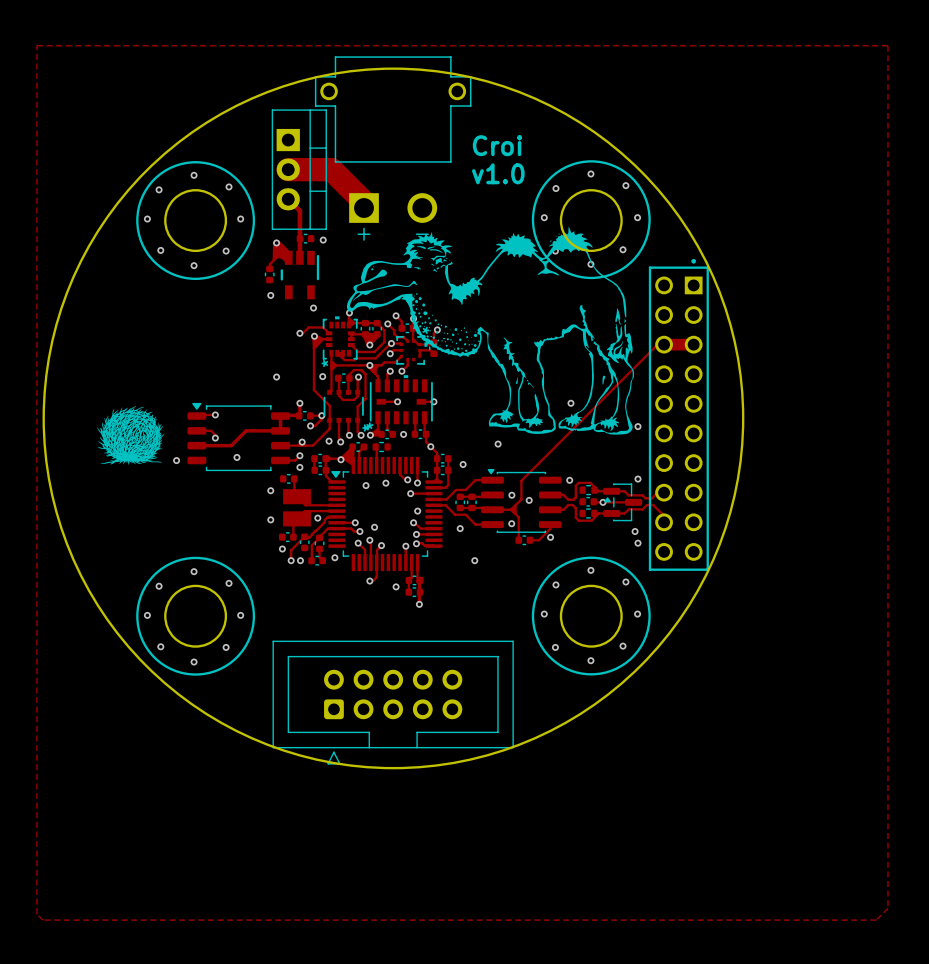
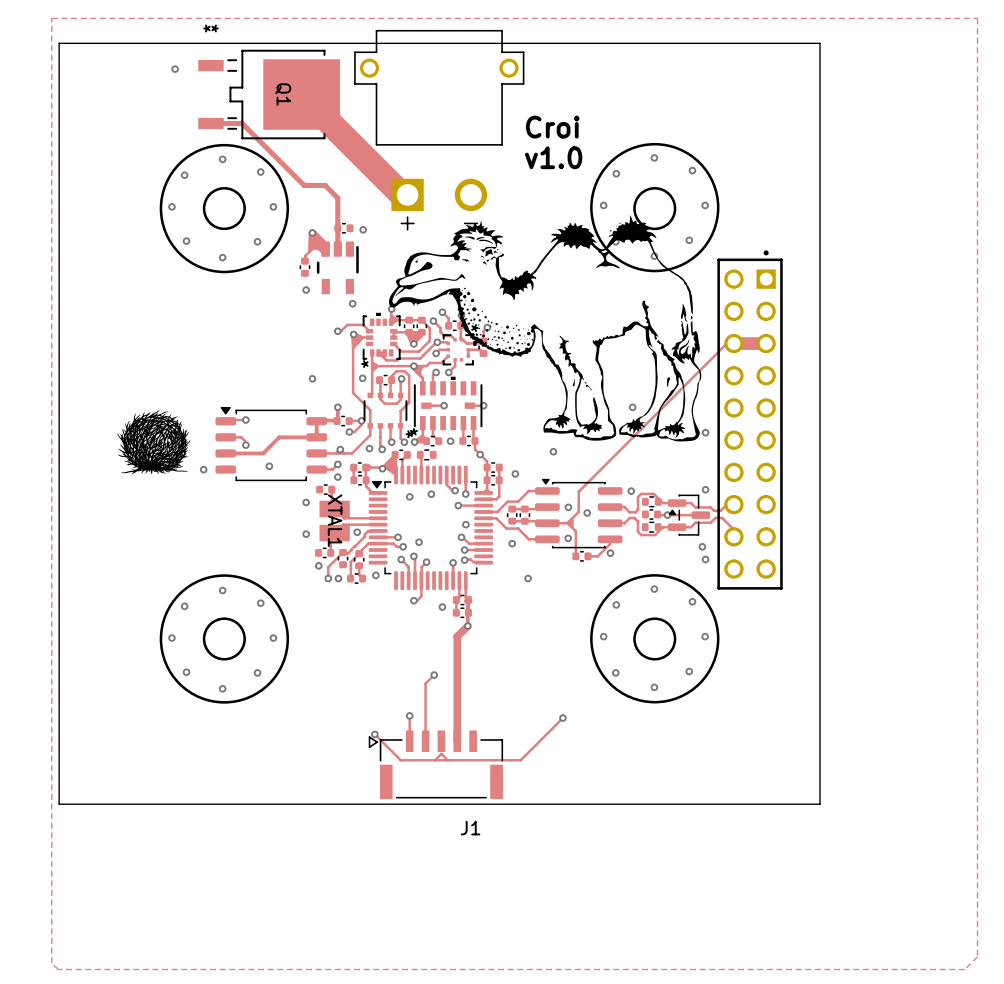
round board edge: [42, 67, 745, 770] -> none
board edge: none -> (59, 43) (820, 43) (820, 804) (59, 804) (59, 43)
via: none -> (175, 69)
Q1: none -> (269, 94)
track: none -> (301, 94) (402, 194) (407, 194)
track: none -> (210, 123) (242, 123) (304, 185) (325, 185)
track: (288, 169) (331, 169) (364, 202) -> none
part: (299, 169) -> none
round board edge size: [164, 189, 228, 253] -> [202, 187, 246, 231]
round board edge size: [559, 189, 623, 253] -> [633, 187, 677, 231]
XTAL1 name: none -> XTAL1 (335, 520)
round board edge size: [164, 584, 228, 648] -> [202, 617, 246, 661]
round board edge size: [559, 584, 623, 648] -> [633, 617, 677, 661]
track: none -> (467, 626) (457, 636) (457, 741)
track: none -> (434, 675) (425, 683) (425, 741)
via: none -> (434, 675)
track: none -> (409, 715) (409, 741)
via: none -> (409, 715)
track: none -> (562, 718) (520, 760) (400, 760) (374, 734)
via: none -> (562, 718)
part: (393, 702) -> none
via: none -> (374, 734)
track: none -> (435, 760) (441, 753) (447, 760)
J1: none -> (435, 764)

